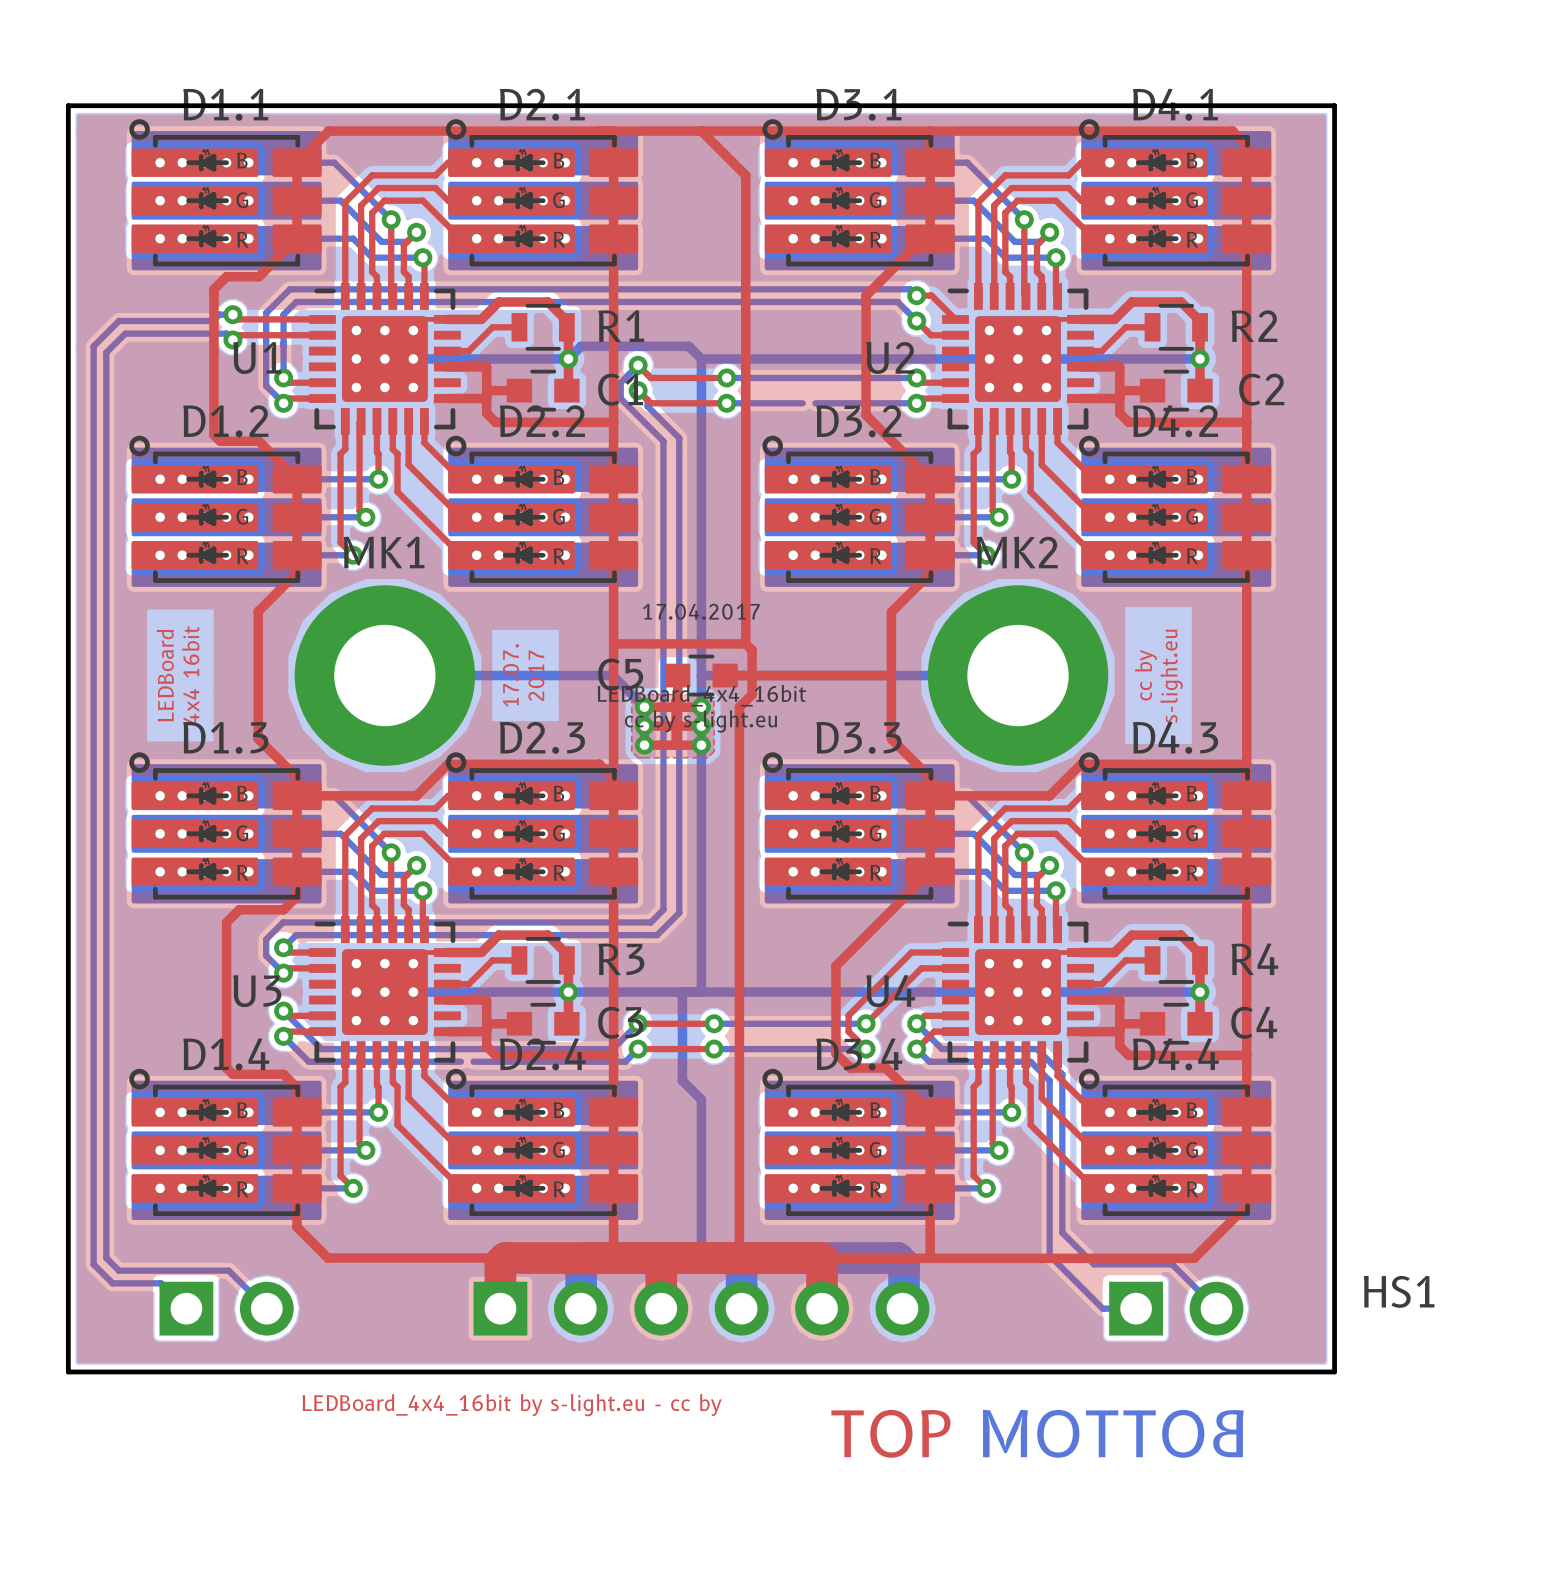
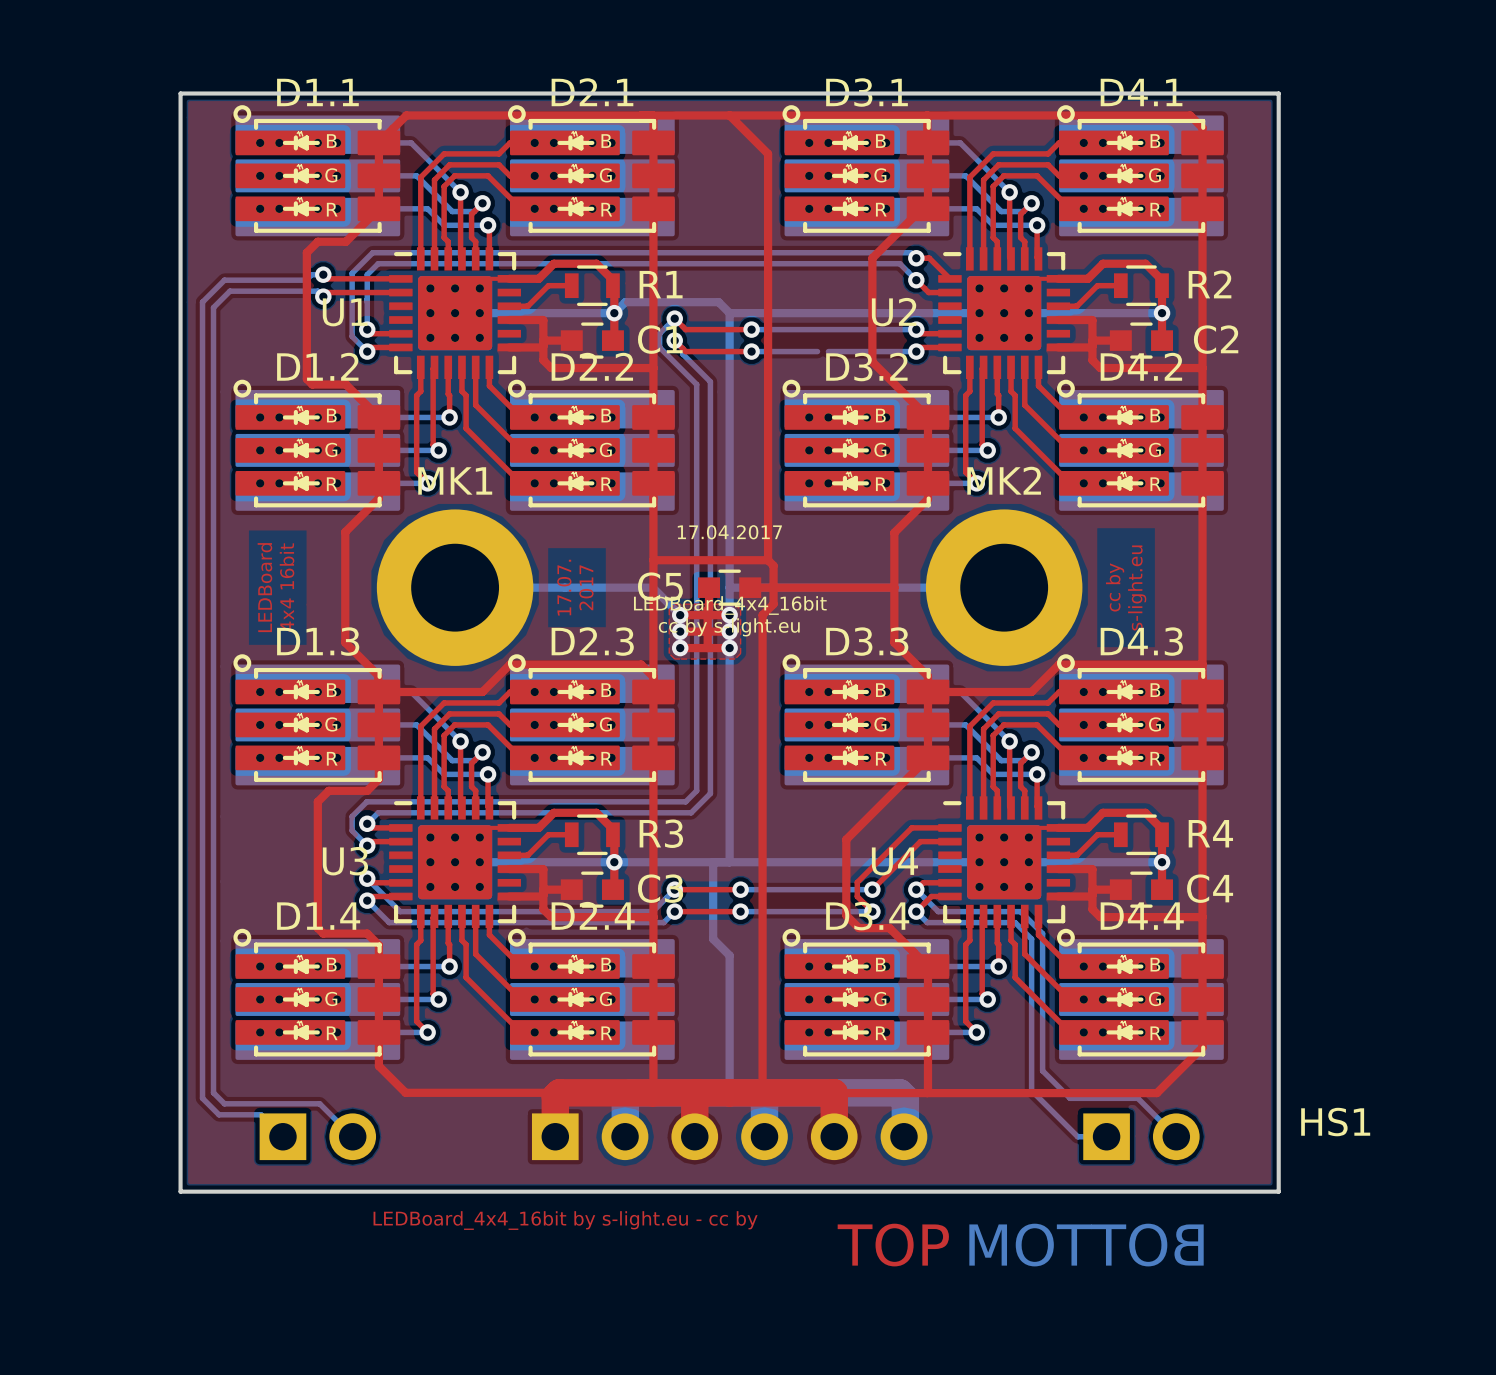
bottom track: none -> (520, 922) (531, 922)

